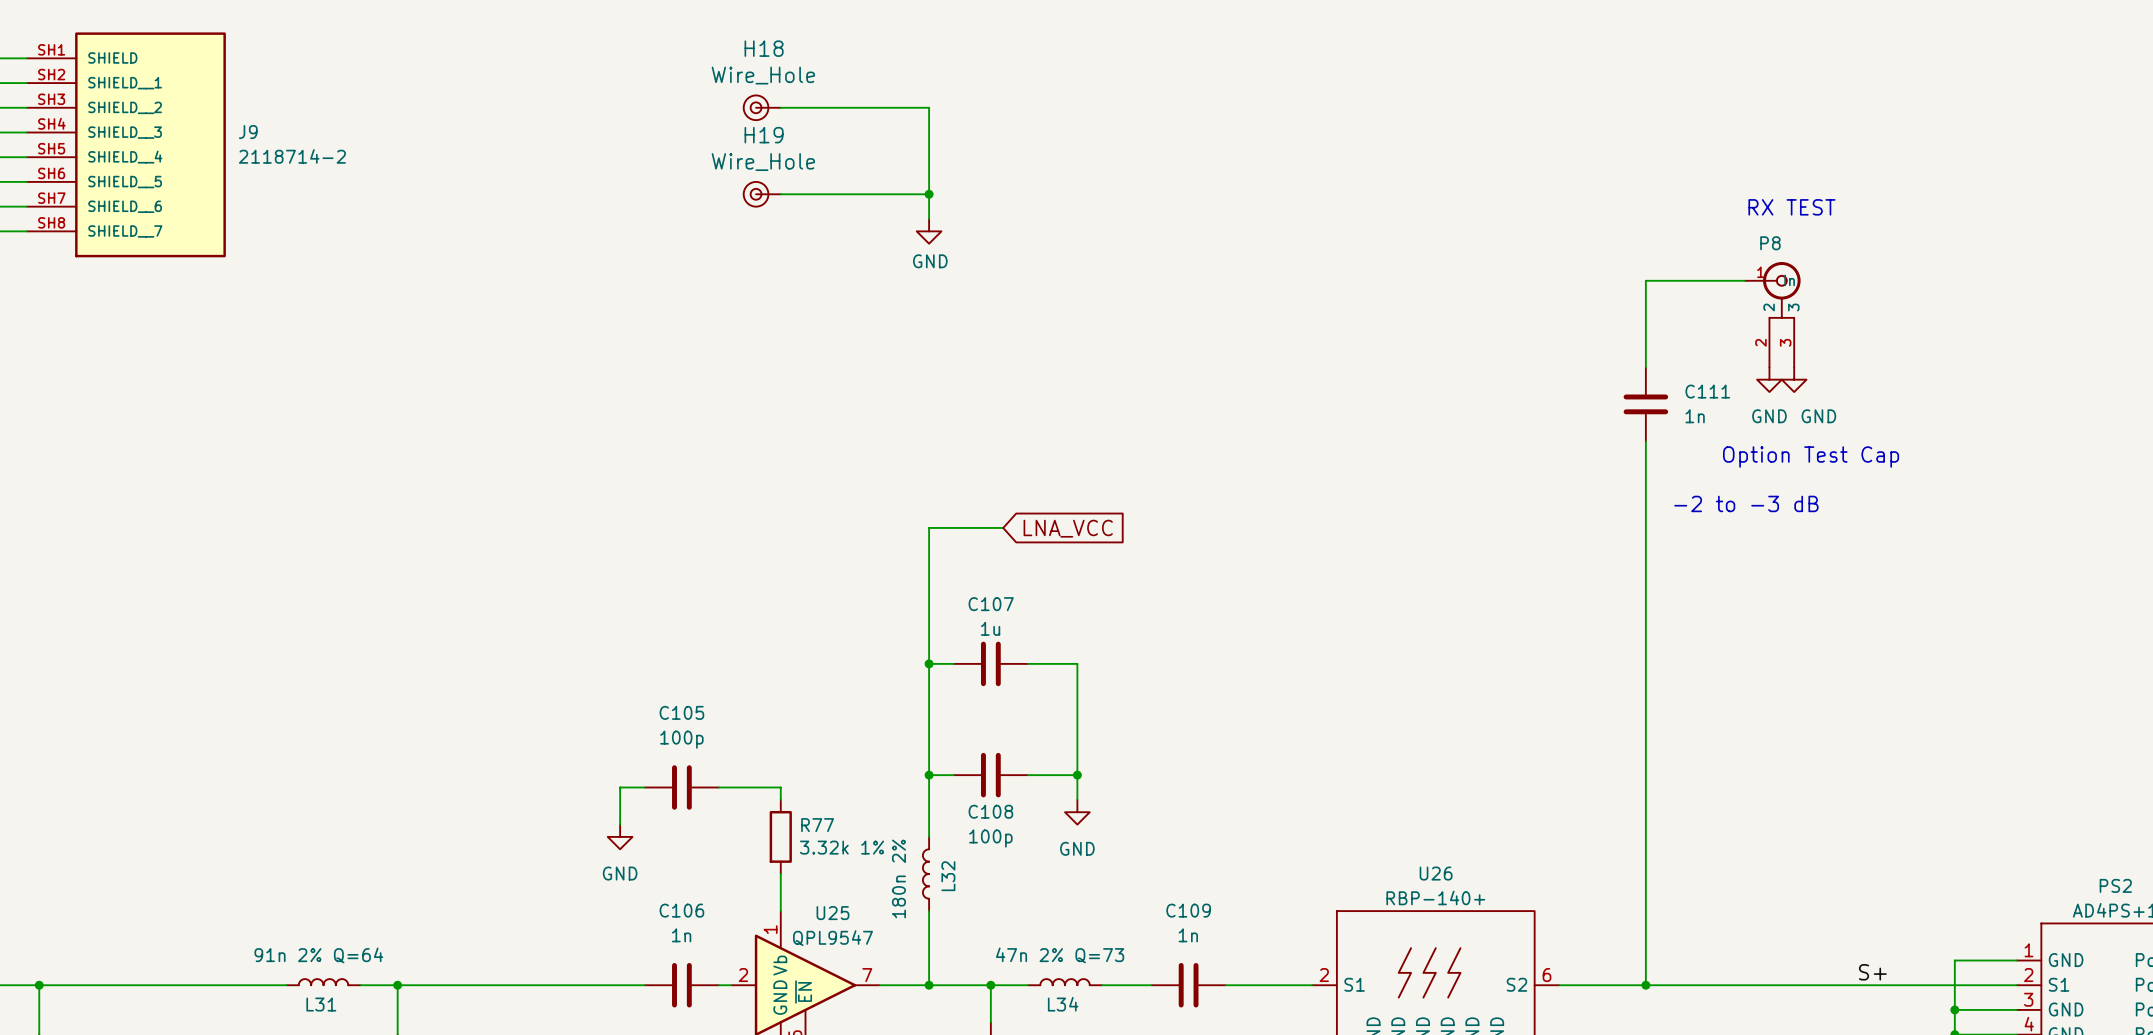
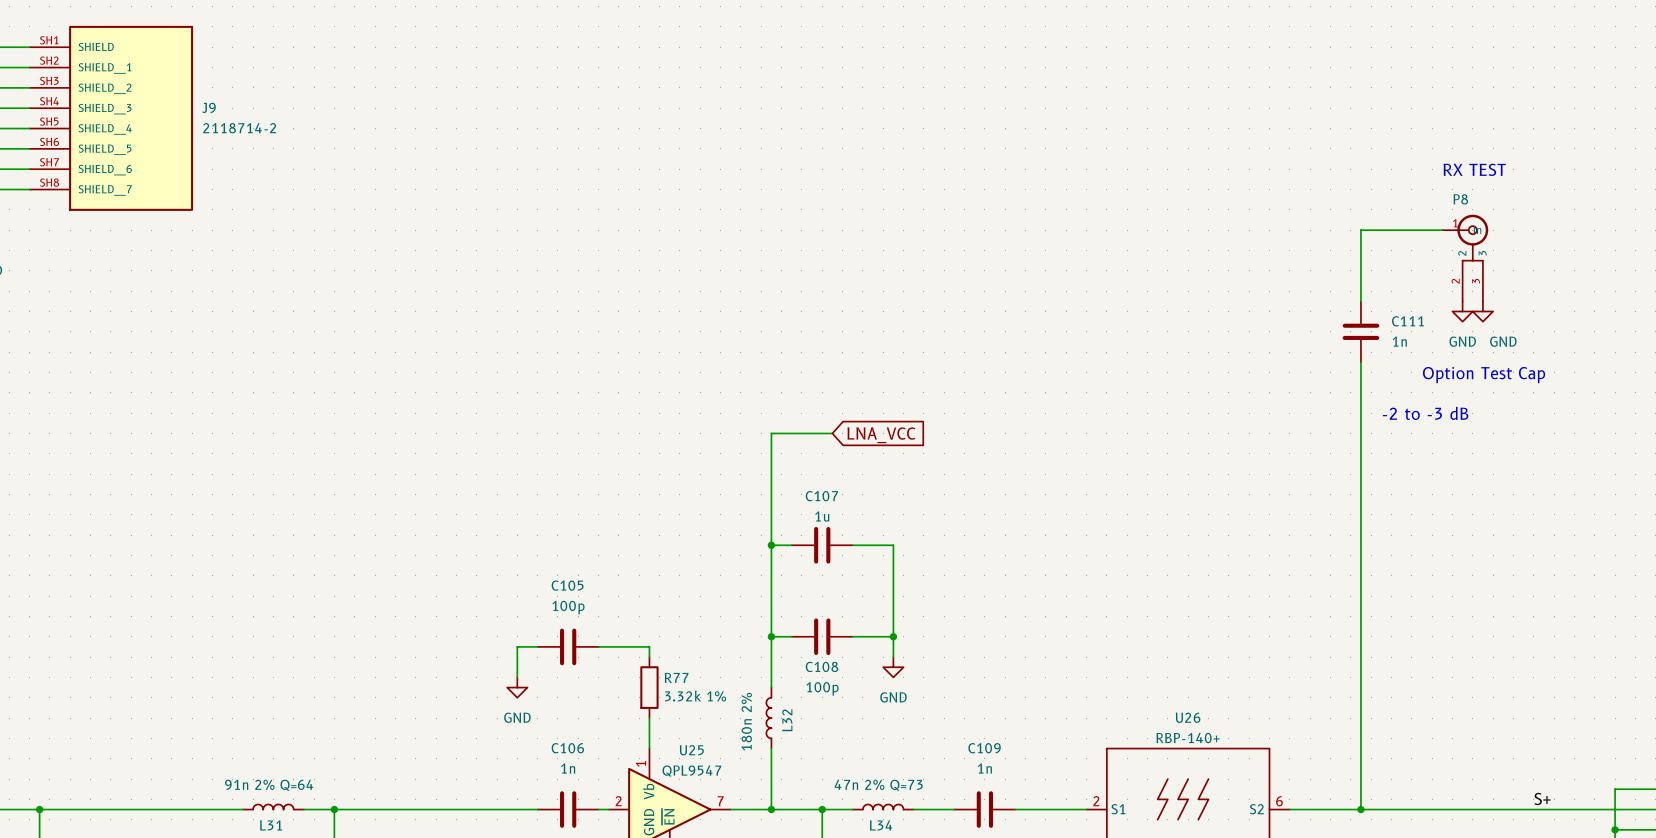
H18: Wire_Hole (762, 107) -> none
wire: (780, 107) (929, 107) (929, 219) -> none
H19: Wire_Hole (762, 194) -> none
wire: (780, 194) (929, 194) -> none
junction: (929, 194) -> none
power symbol: GND (929, 231) -> none

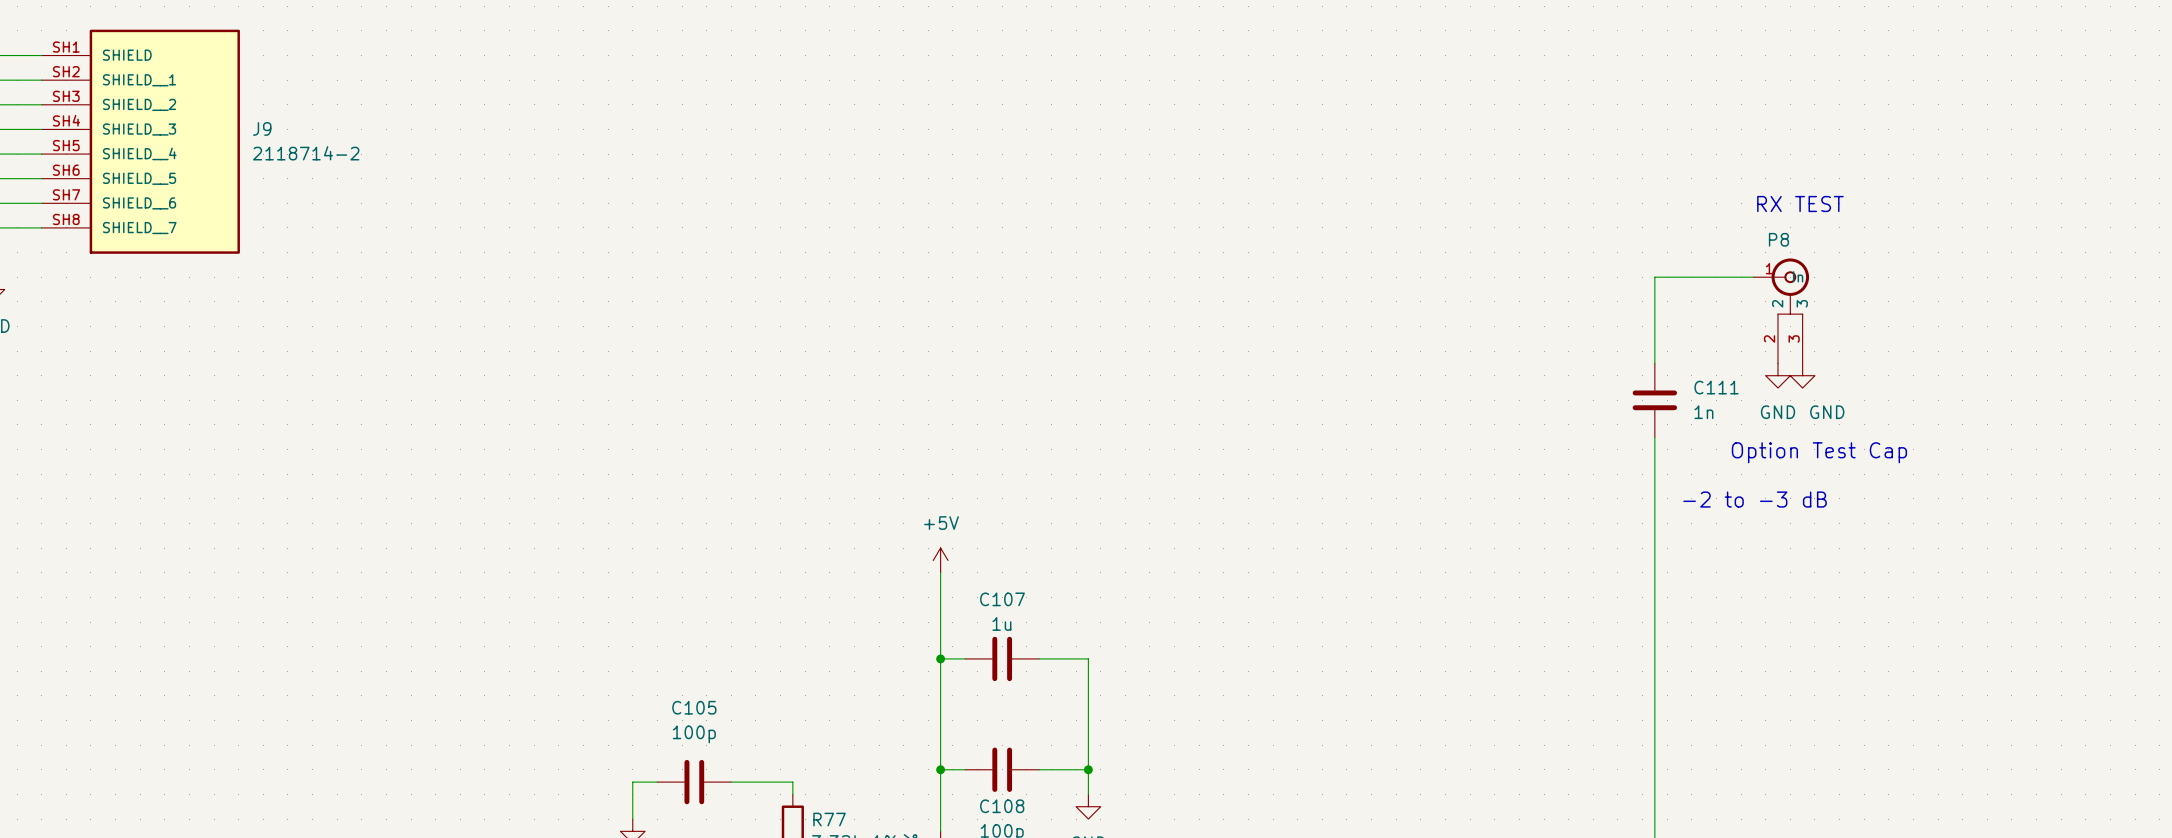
wire: (832, 433) (771, 433) (771, 474) -> none
global label: LNA_VCC (881, 435) -> none
power symbol: none -> +5V (940, 560)

